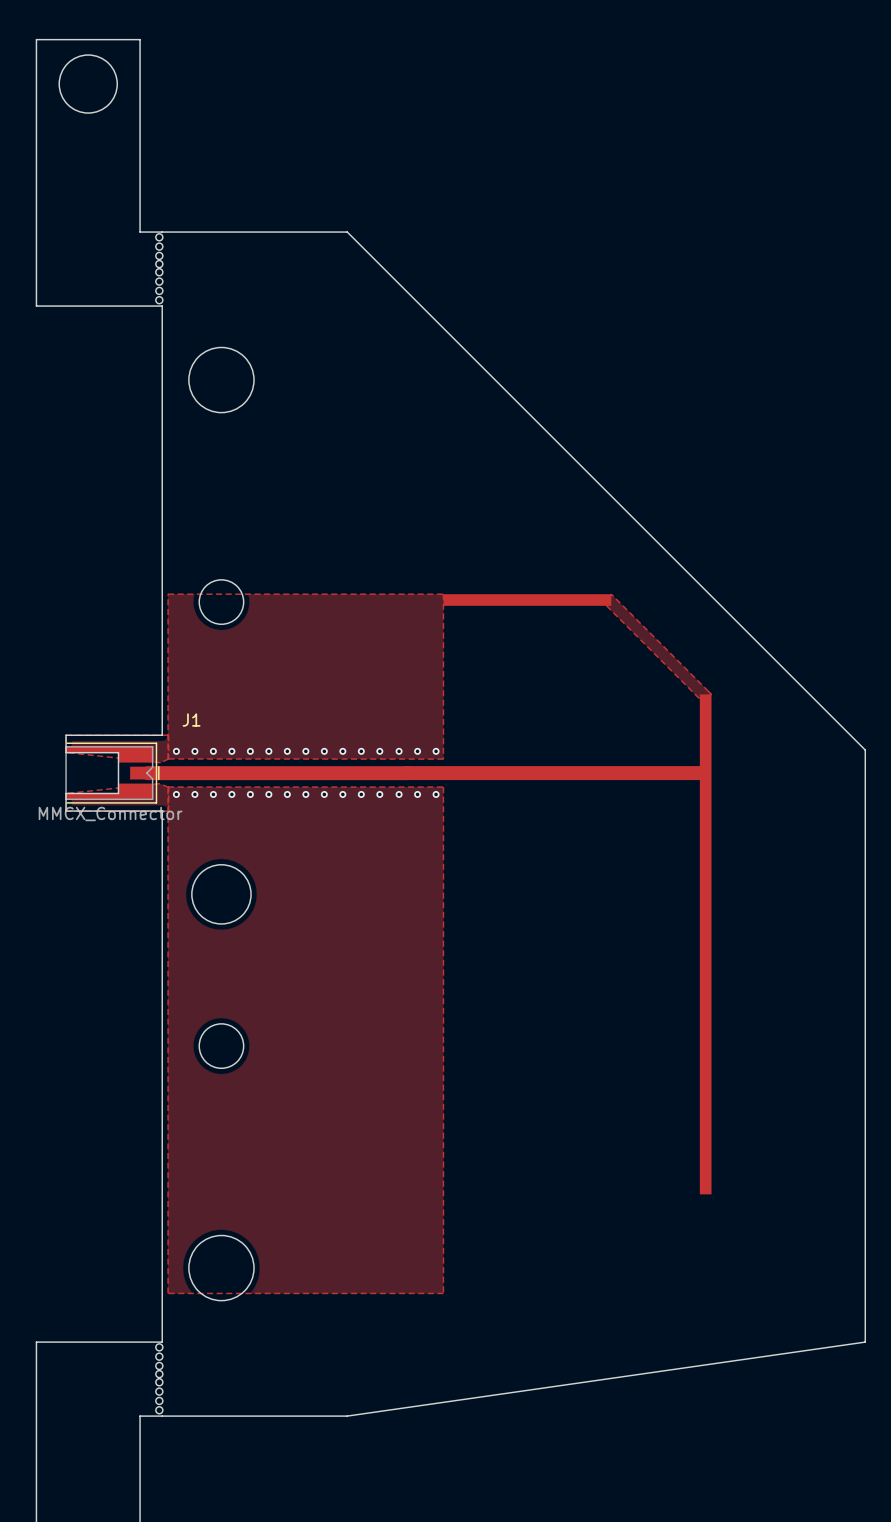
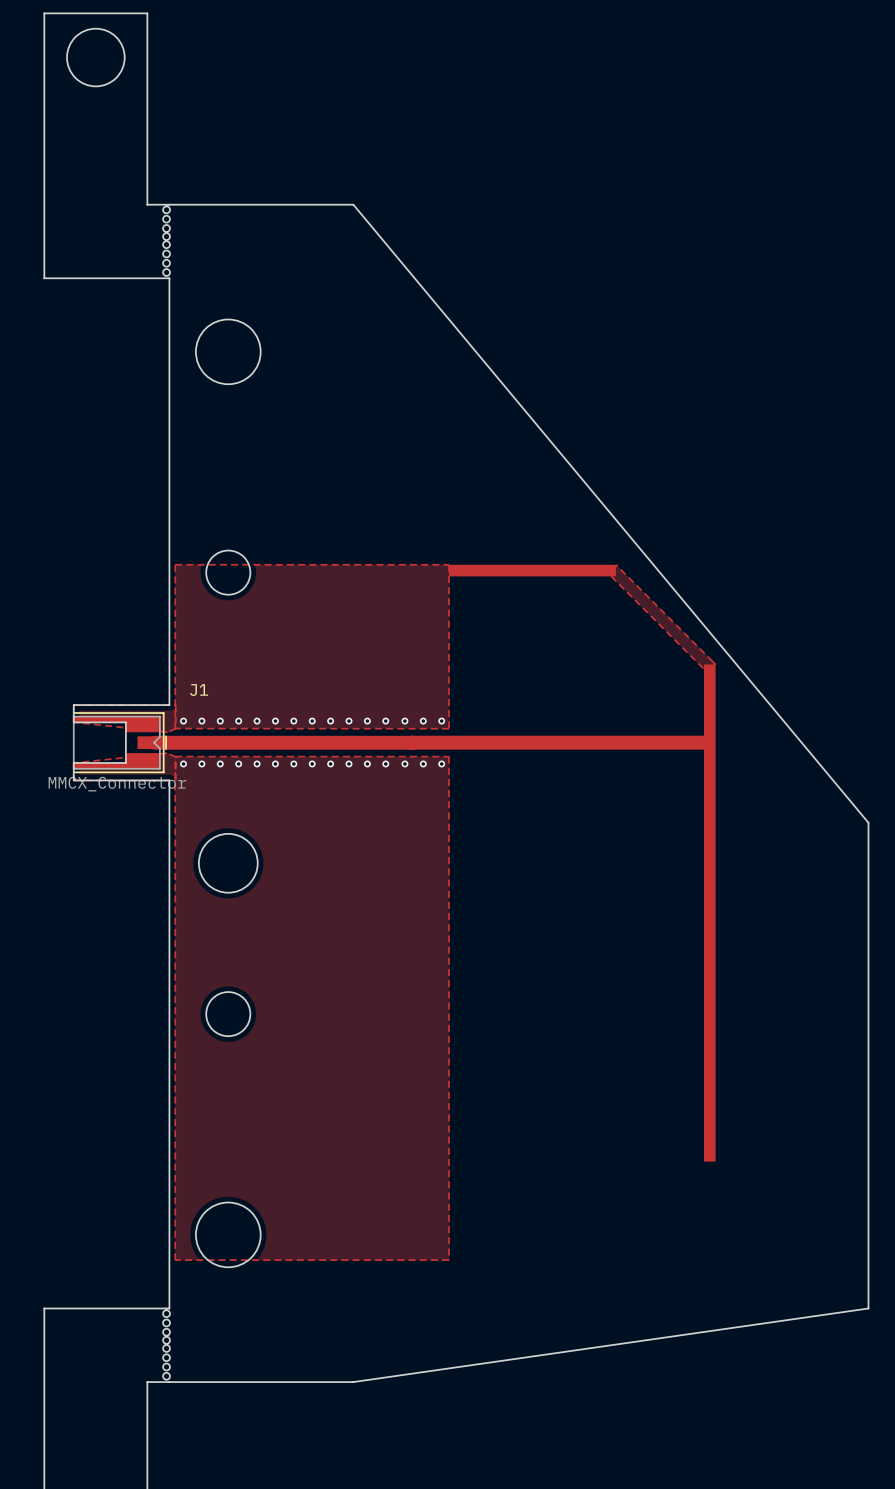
board edge: (347, 232) (865, 750) (865, 853) -> (353, 204) (868, 822)

